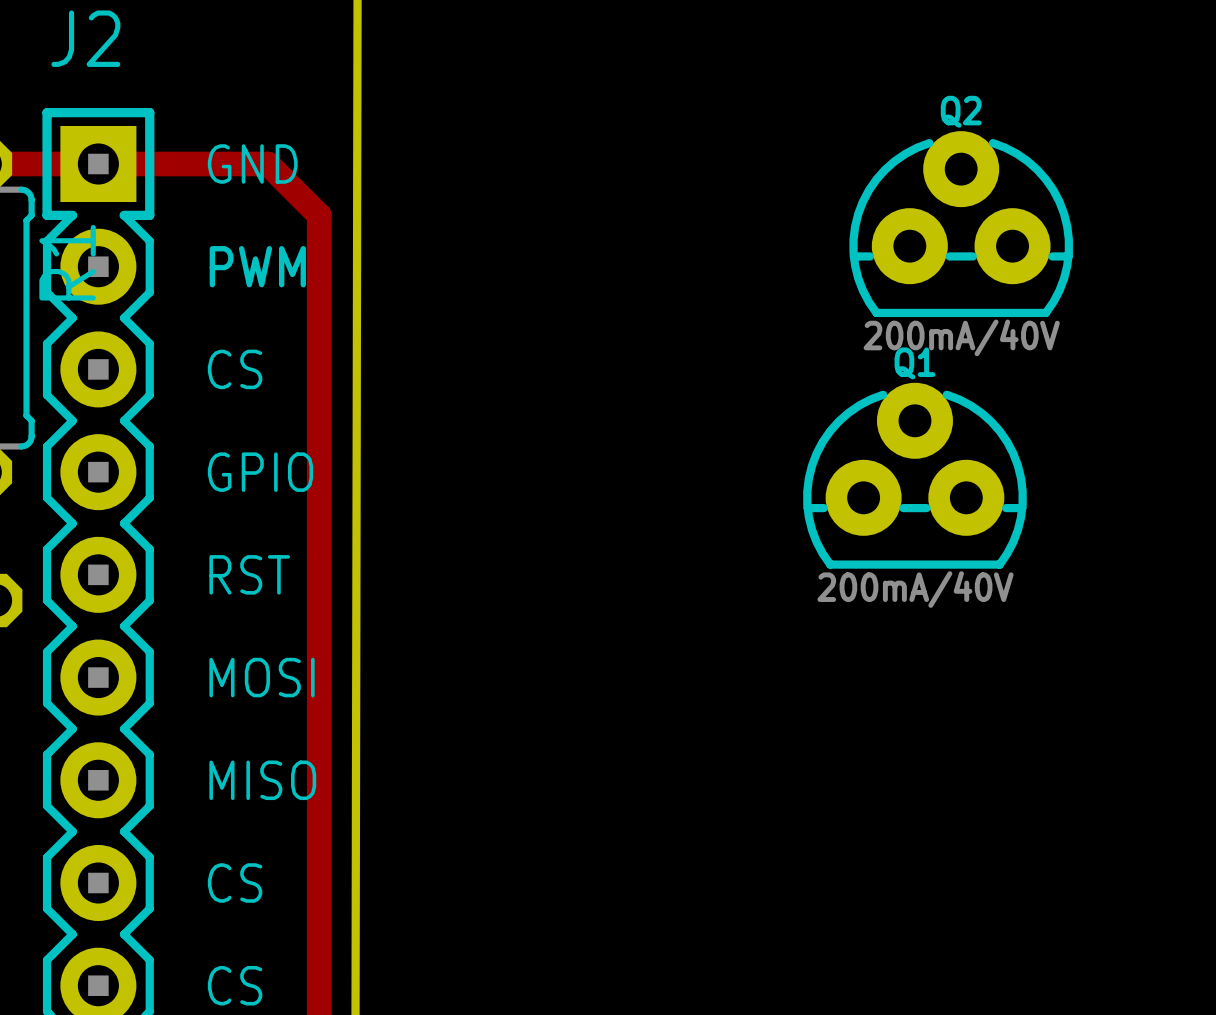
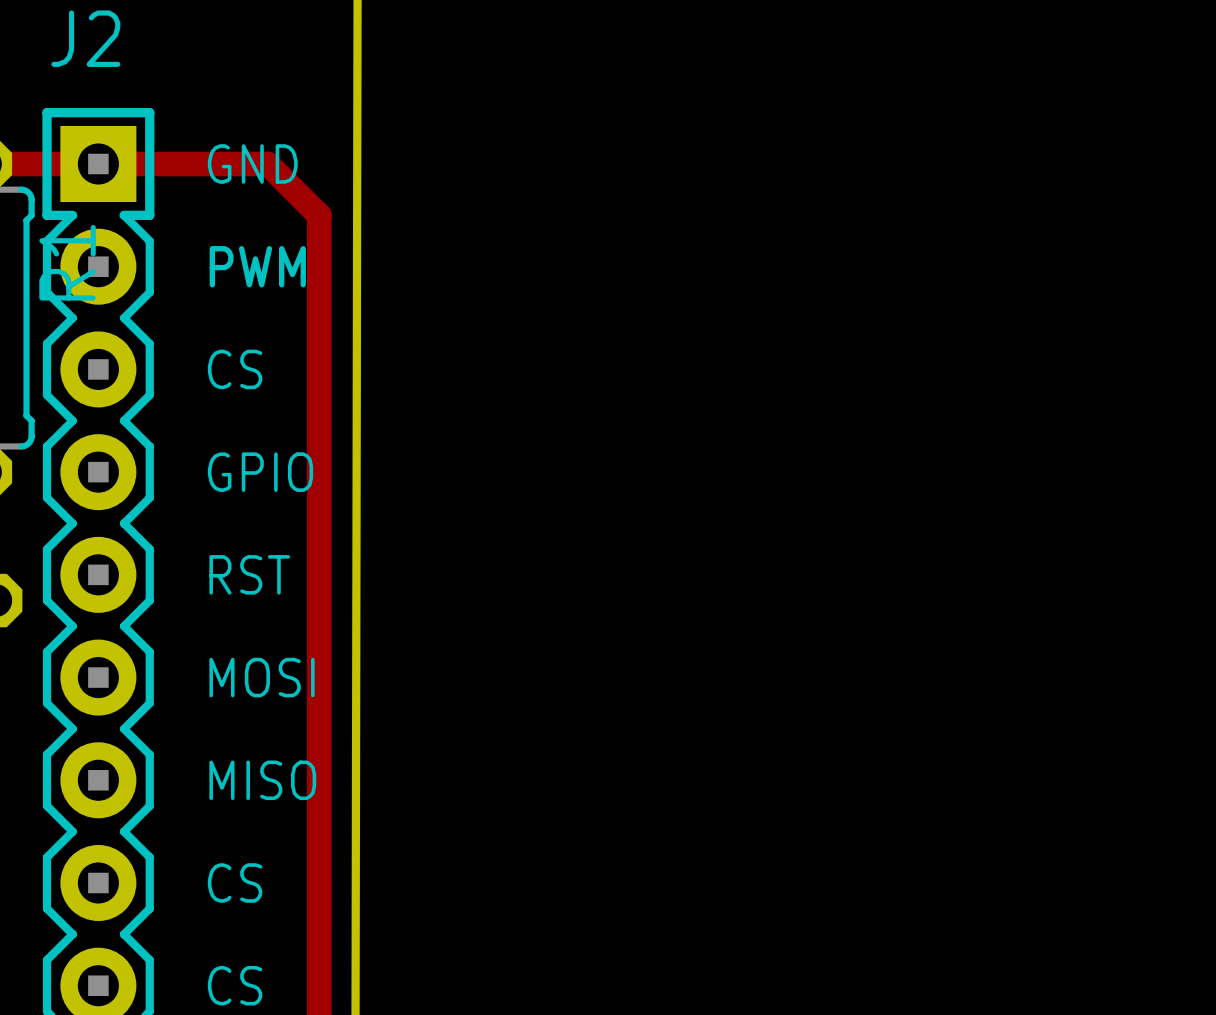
Q2: 200mA/40V (961, 224) -> none
Q1: 200mA/40V (914, 475) -> none

